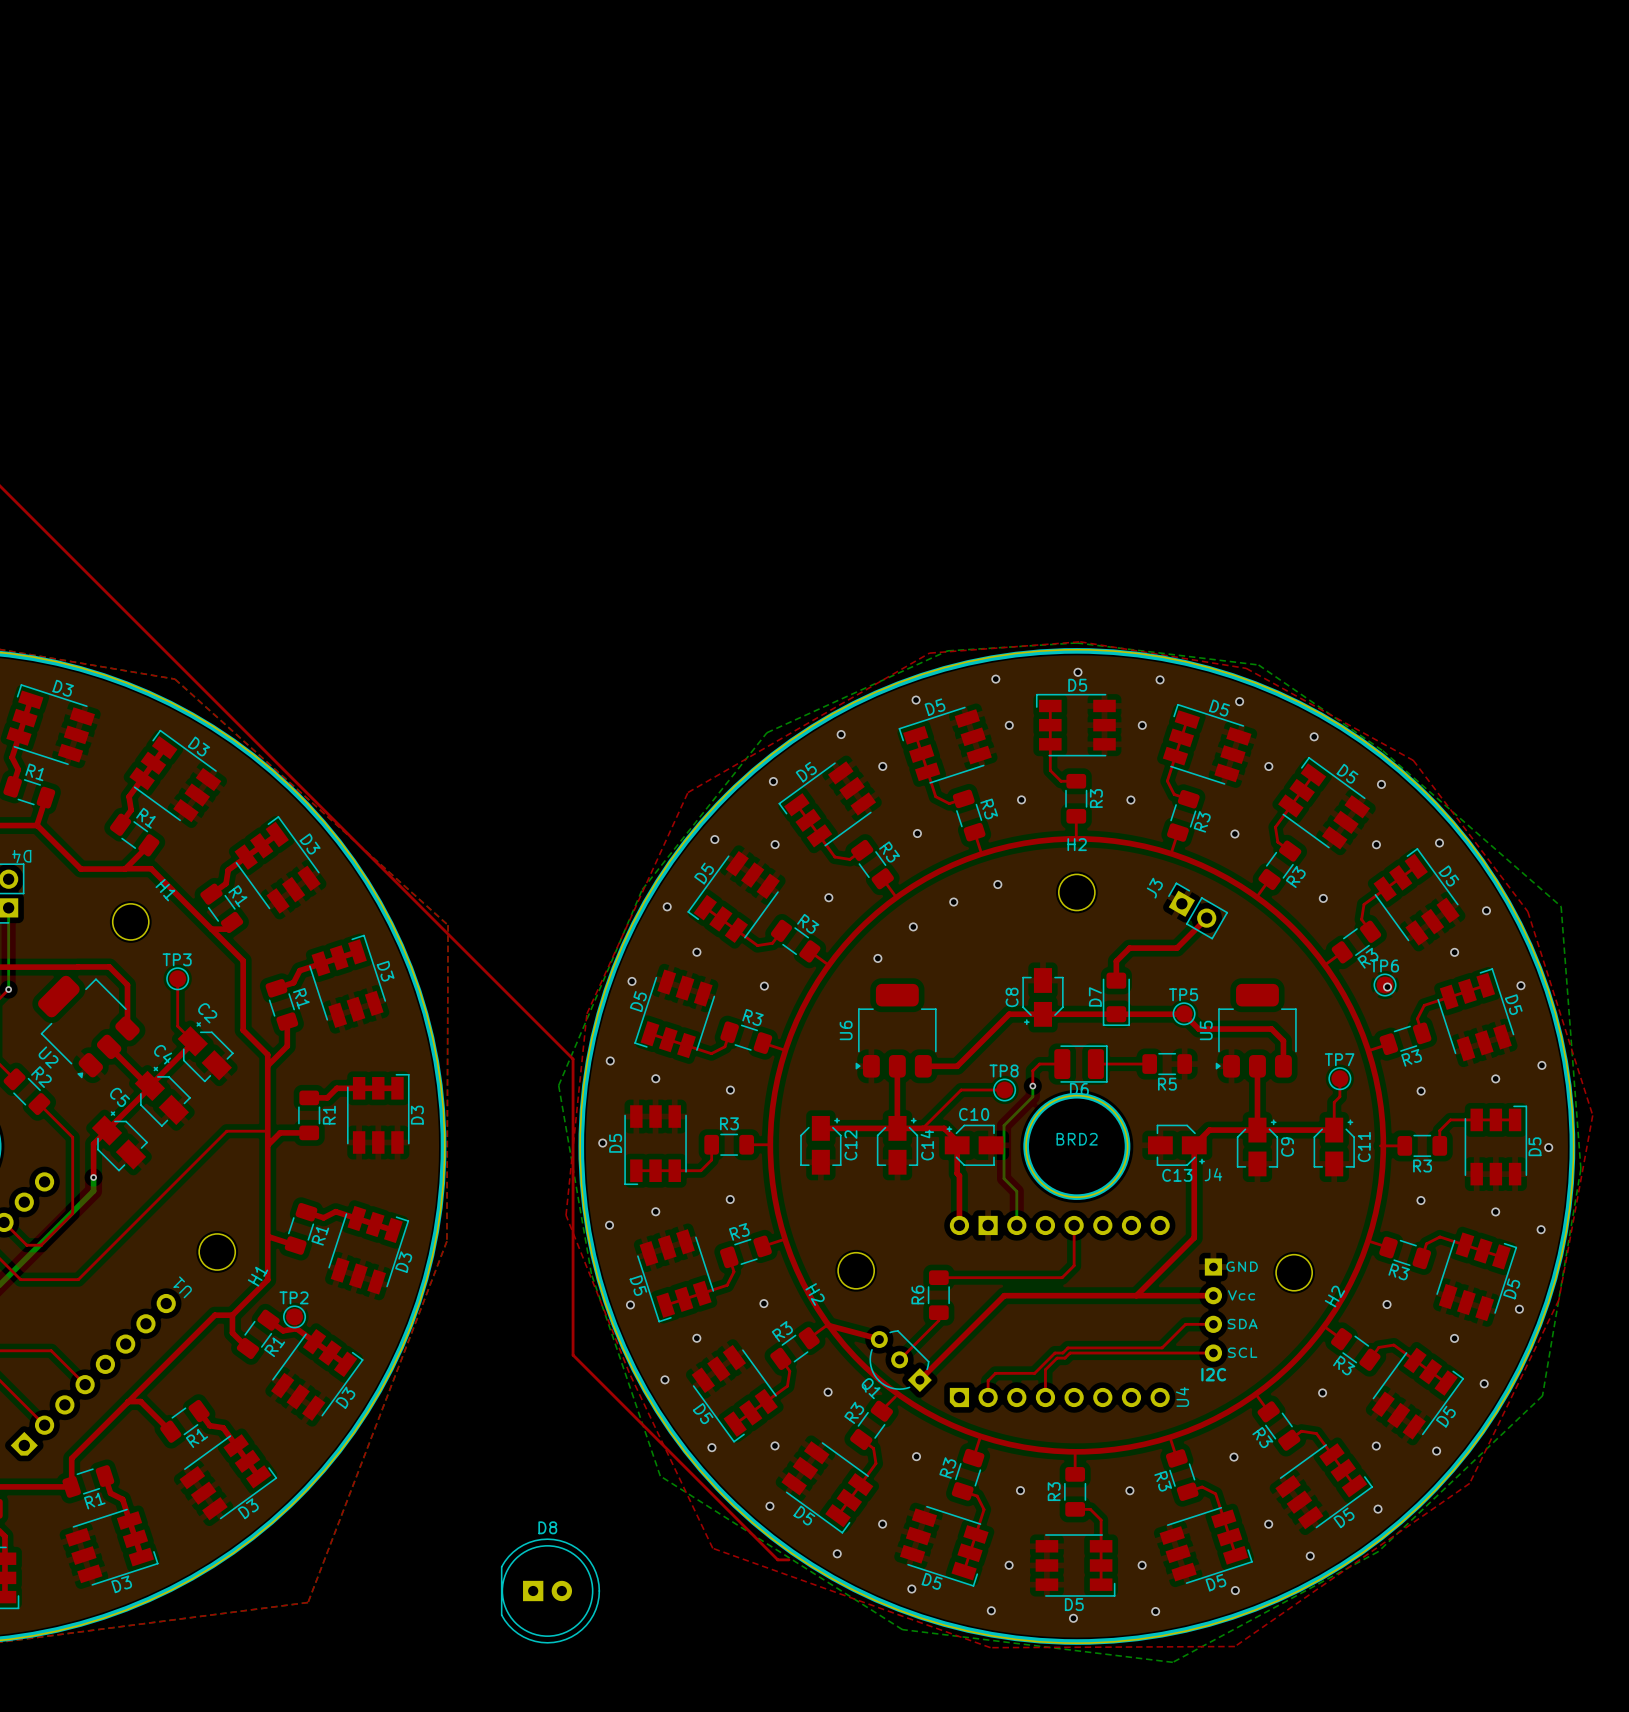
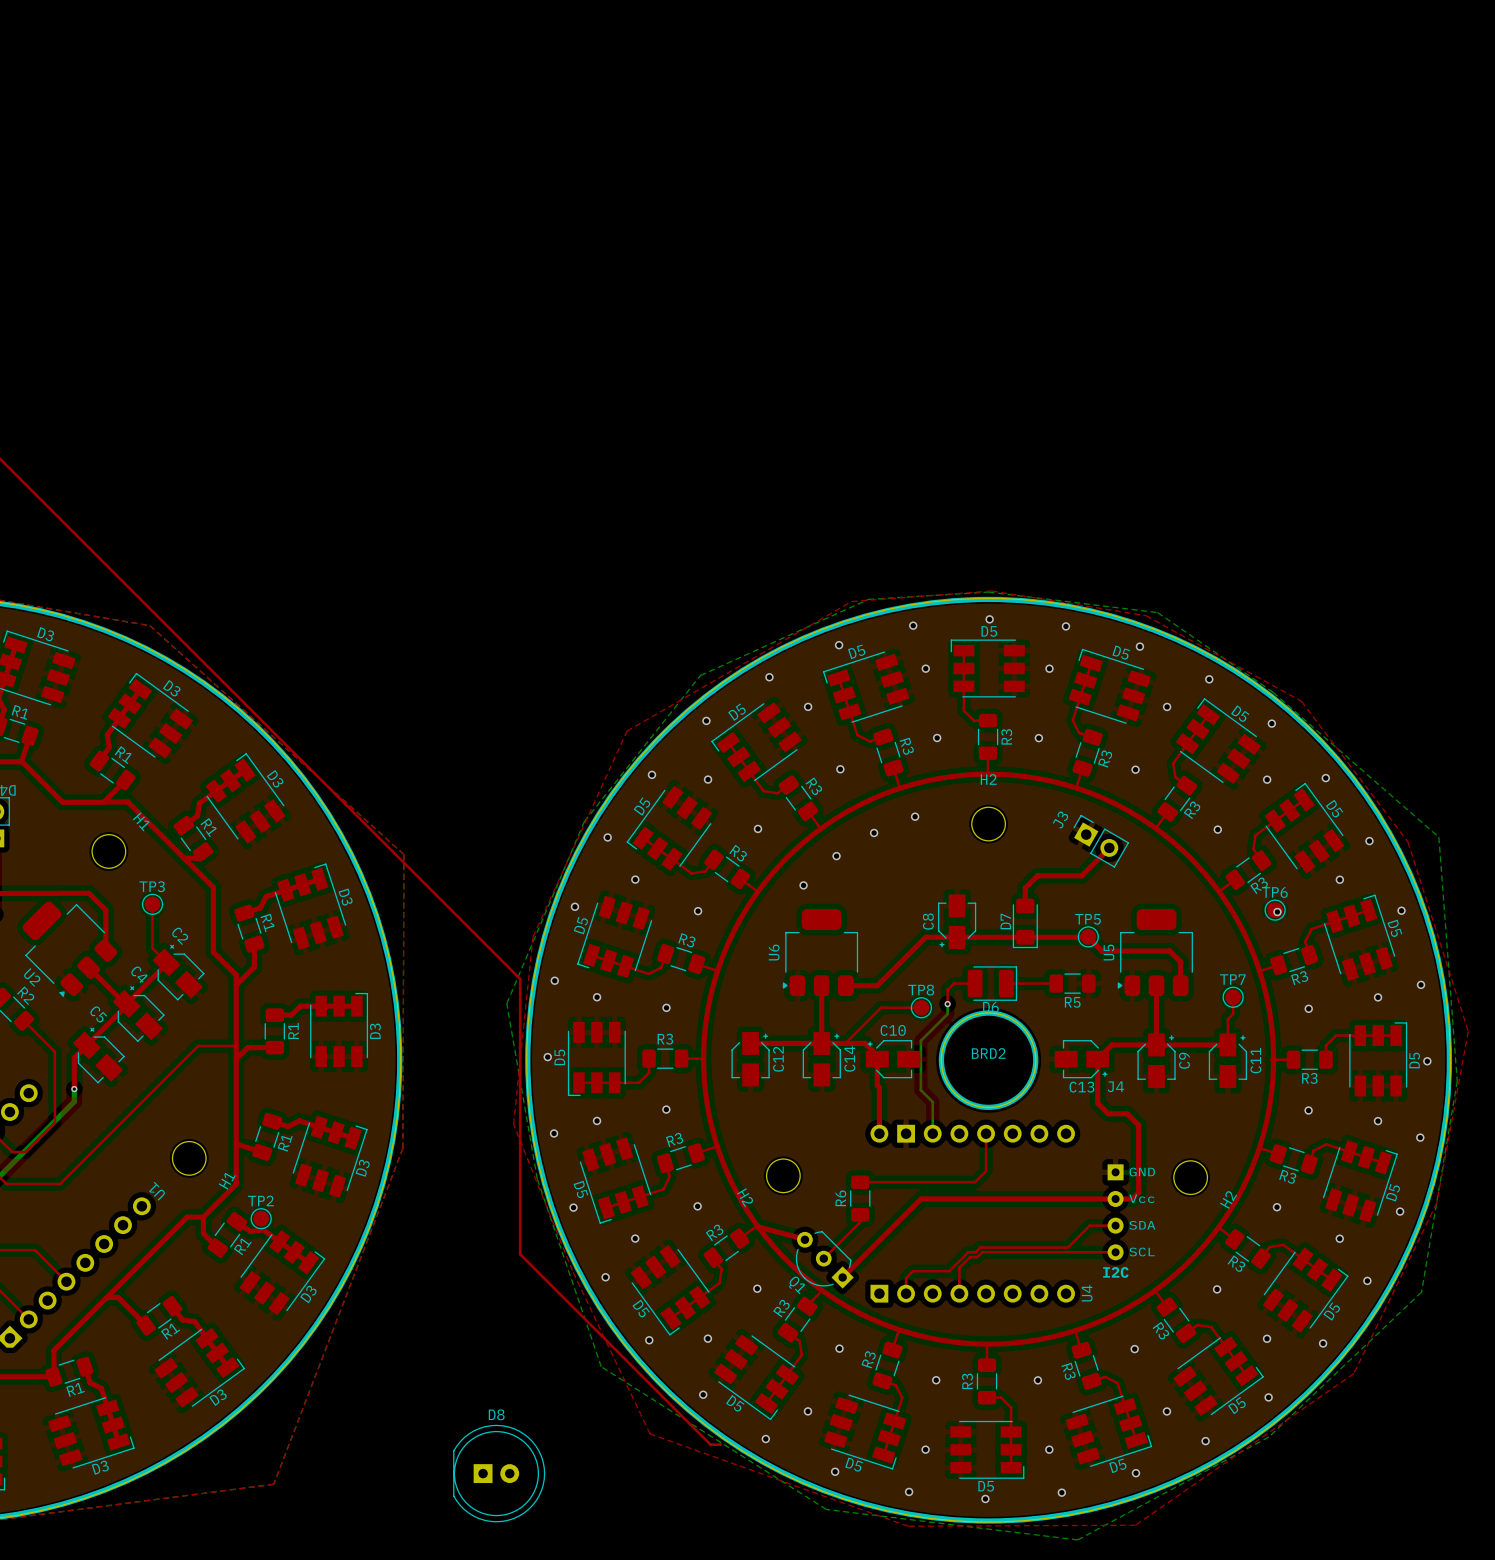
top track: (1194, 1192) (1194, 1237) (1136, 1295) -> (1097, 1103) (1108, 1113) (1127, 1113) (1138, 1125) (1138, 1192) (1132, 1198) (1115, 1198)

